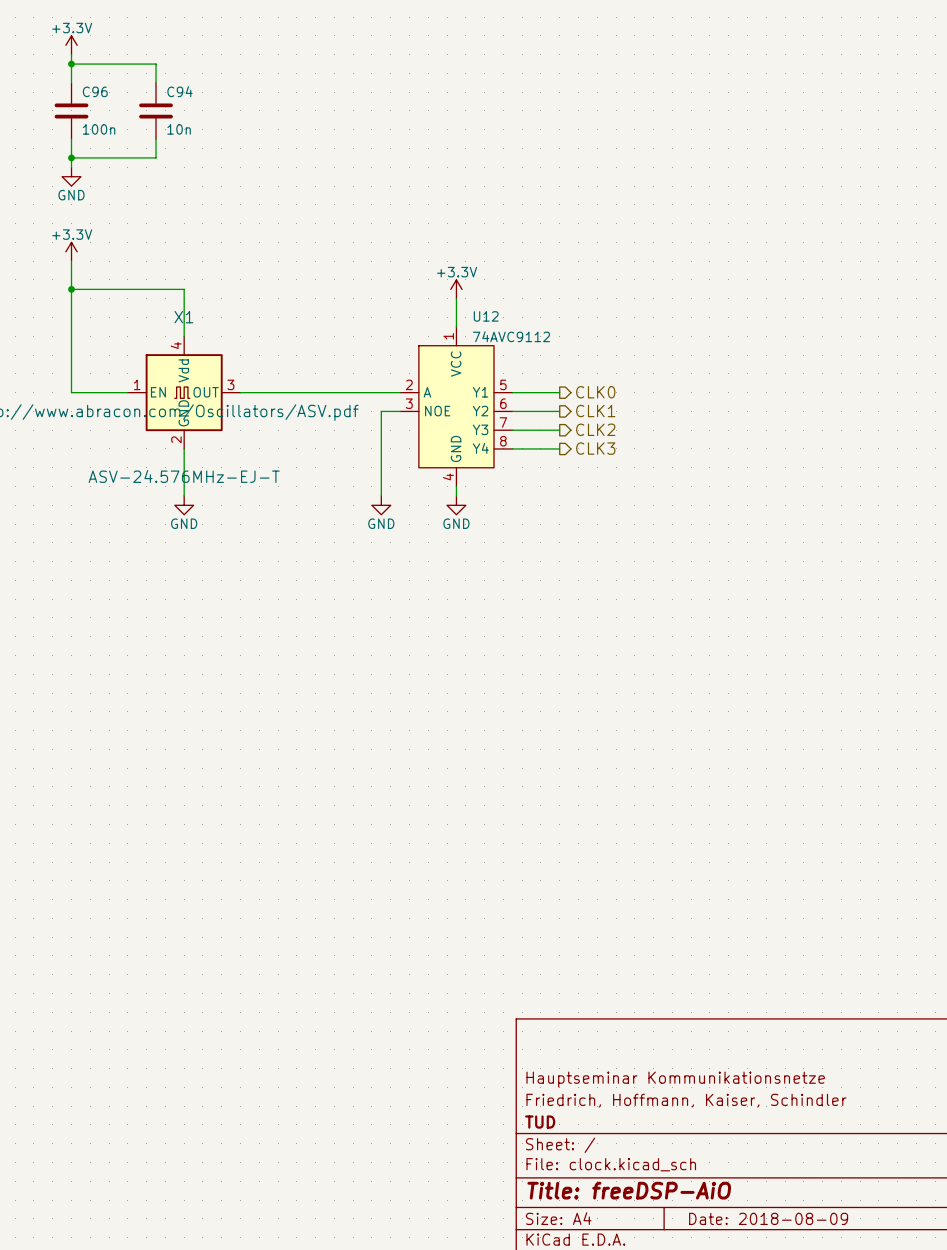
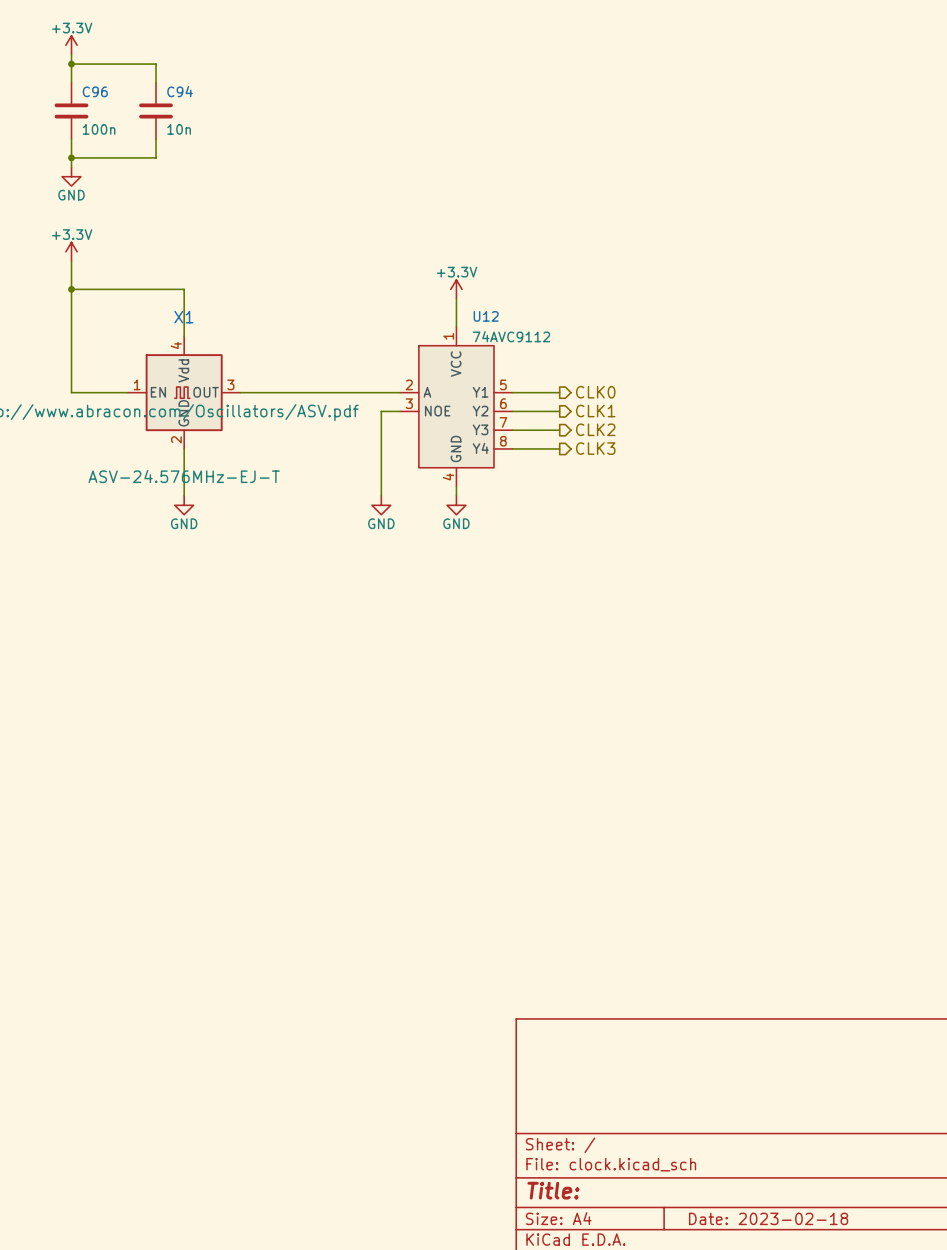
title block: Hauptseminar Kommunikationsnetze (675, 1079) -> none
title block: Friedrich, Hoffmann, Kaiser, Schindler (686, 1100) -> none
title block: TUD (540, 1122) -> none
title block: Title: freeDSP-AiO (629, 1190) -> Title: (553, 1190)
title block: Date: 2018-08-09 (768, 1218) -> Date: 2023-02-18 (768, 1218)

